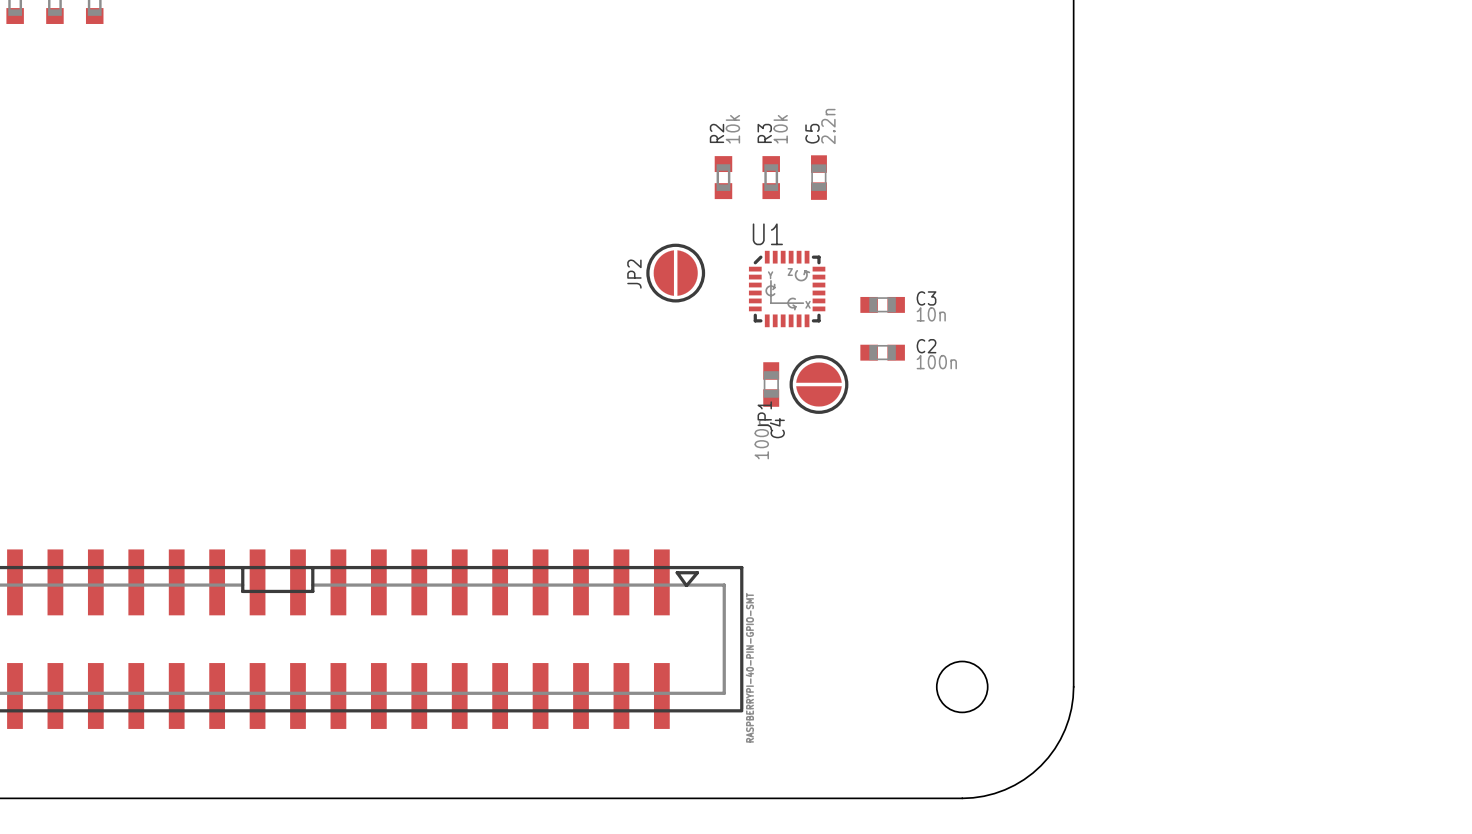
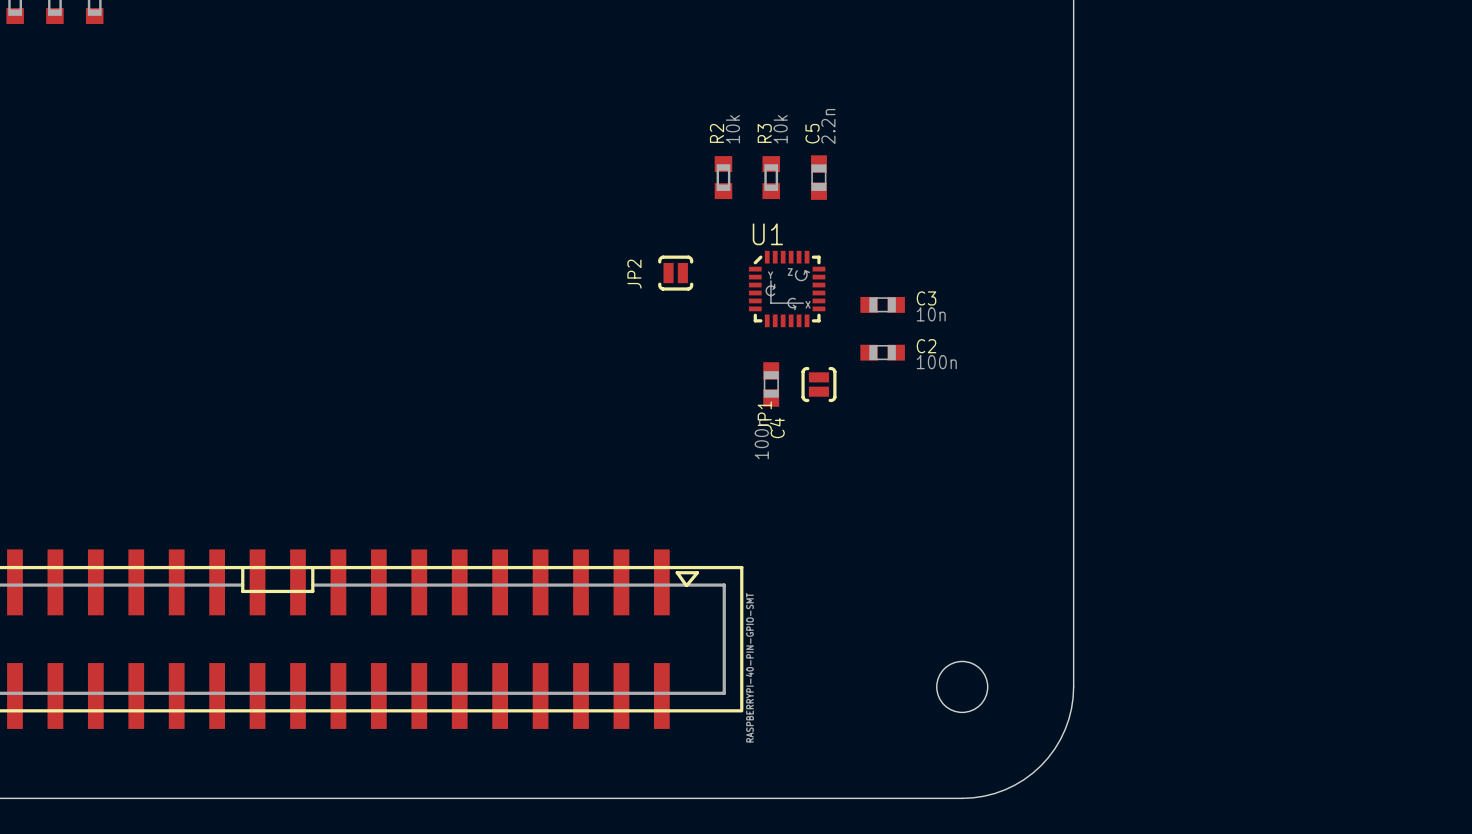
JP2 footprint: [646, 243, 706, 303] -> [658, 255, 694, 291]
JP1 footprint: [789, 355, 849, 414] -> [801, 366, 837, 403]

